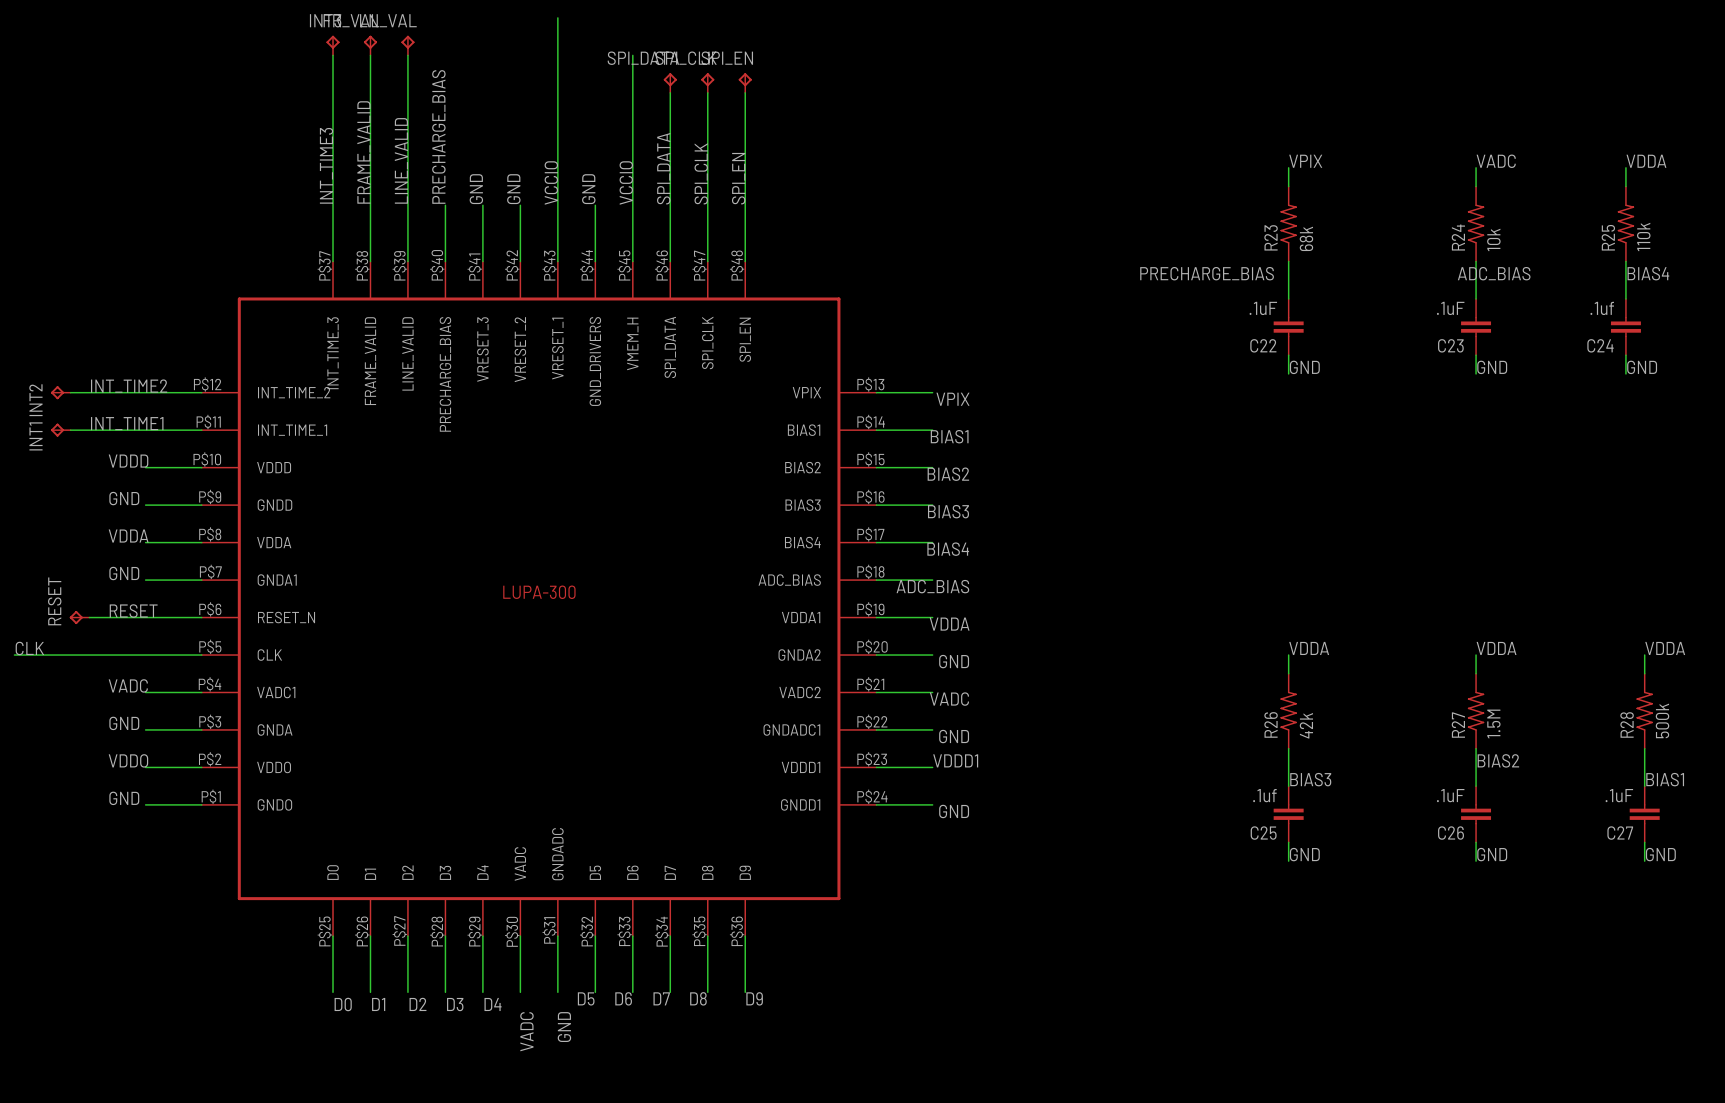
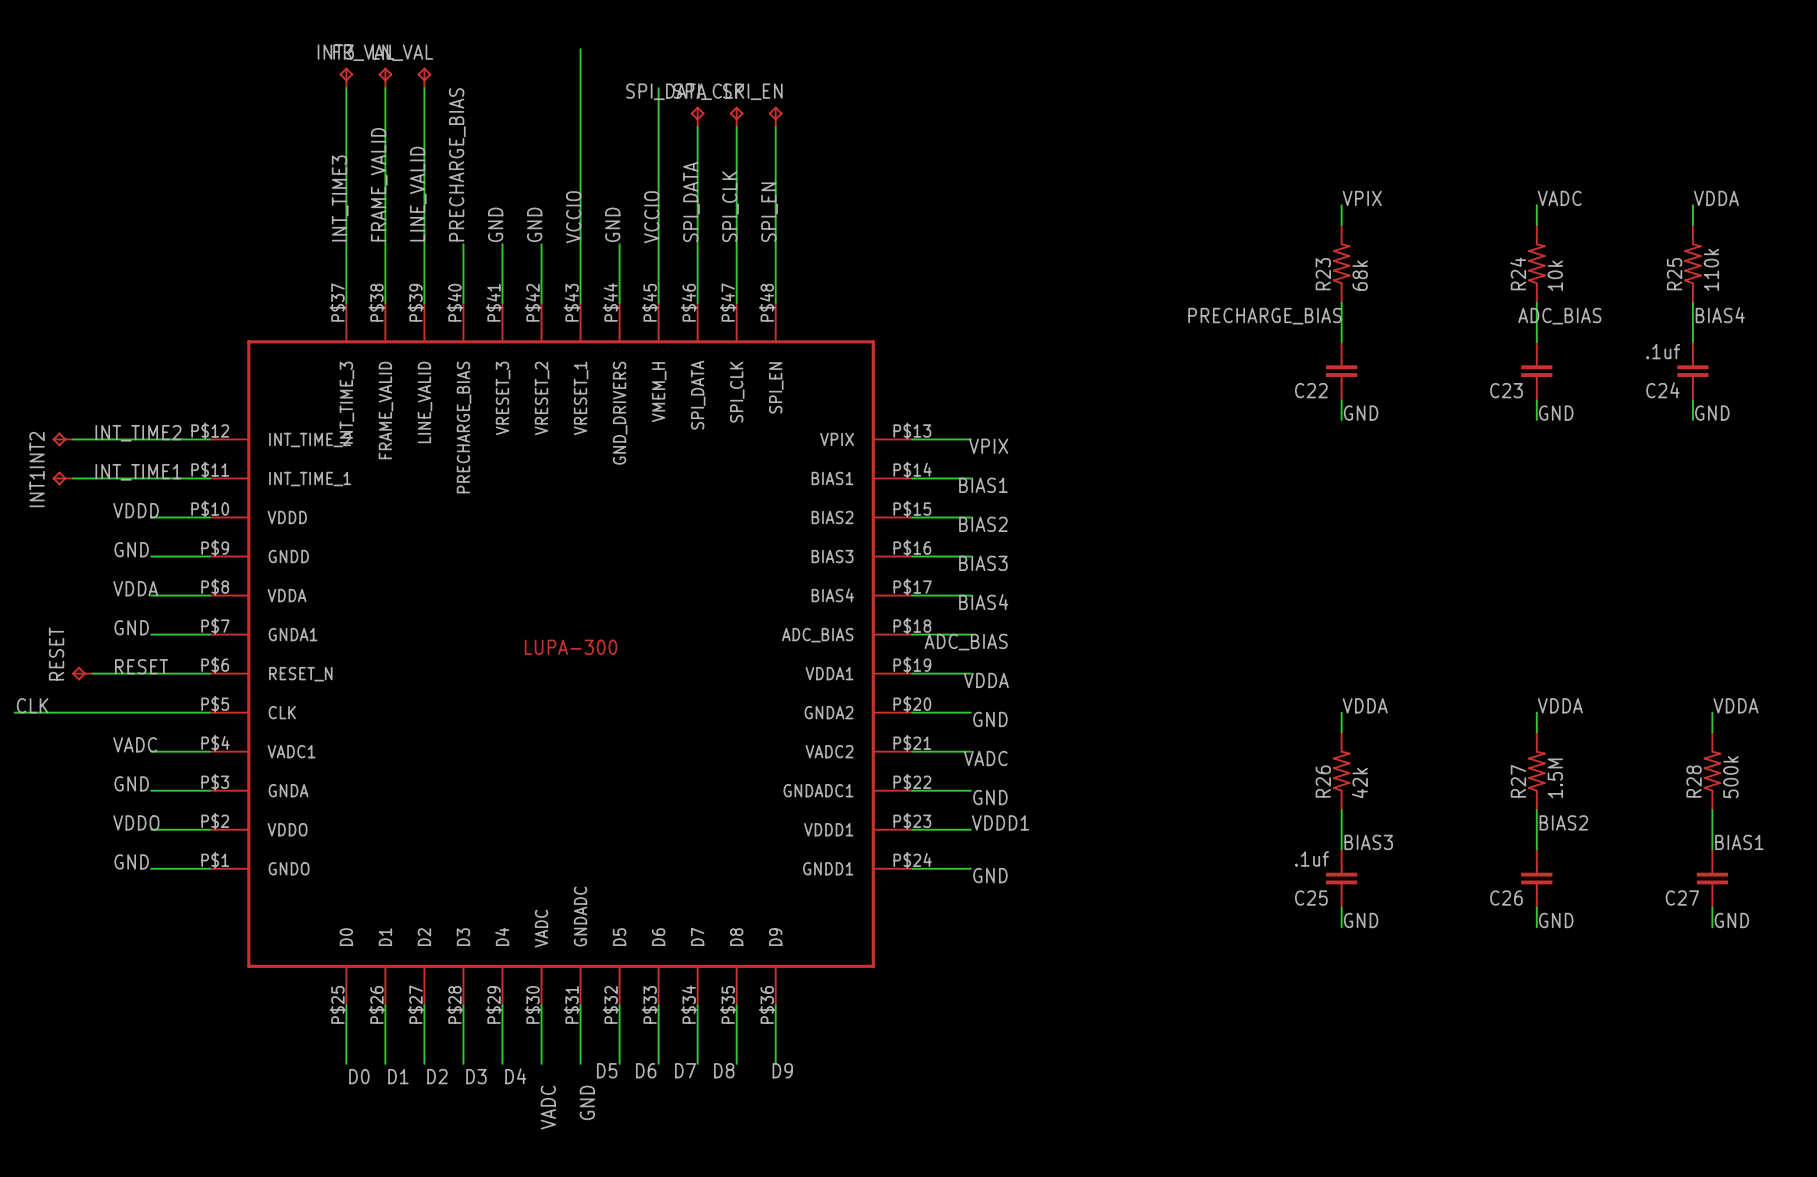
C22 value: .1uF (1263, 308) -> none
C23 value: .1uF (1450, 308) -> none
C26 value: .1uF (1450, 795) -> none
C27 value: .1uF (1619, 795) -> none

